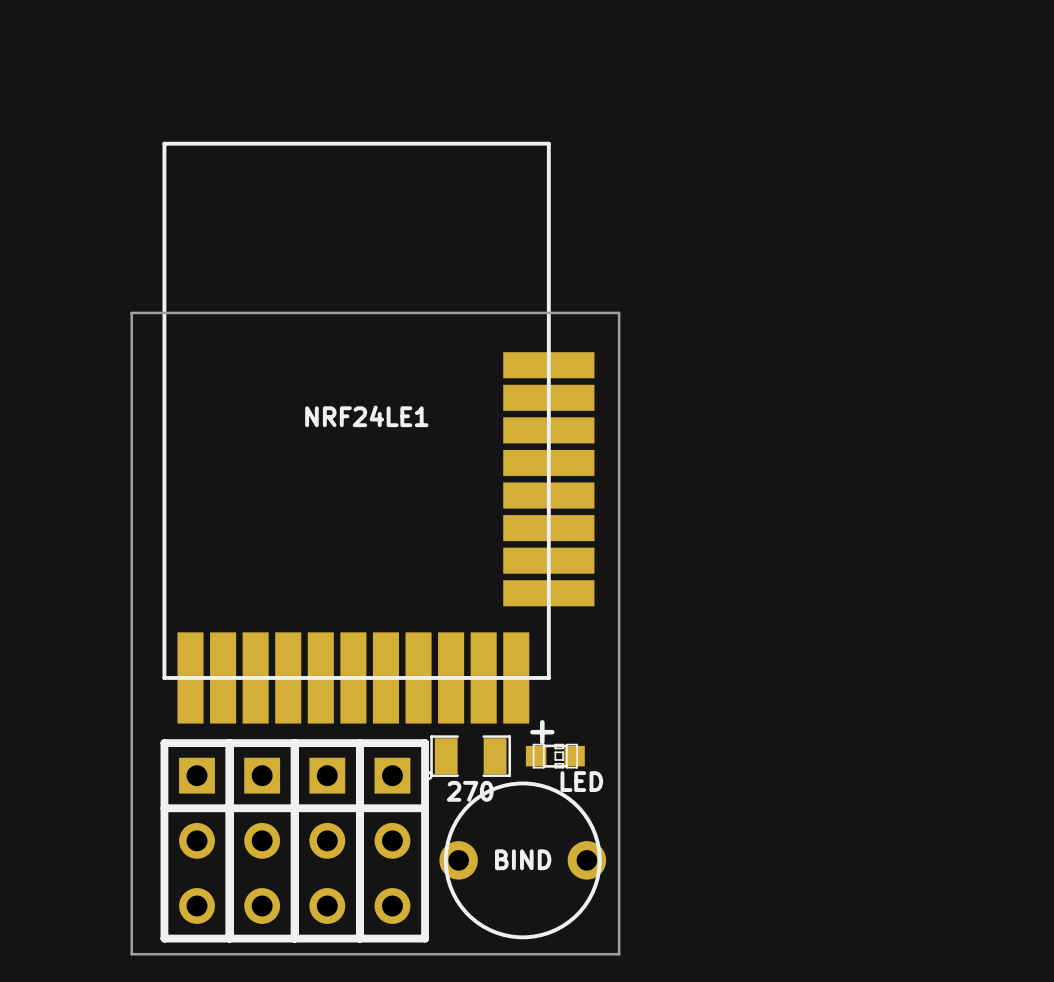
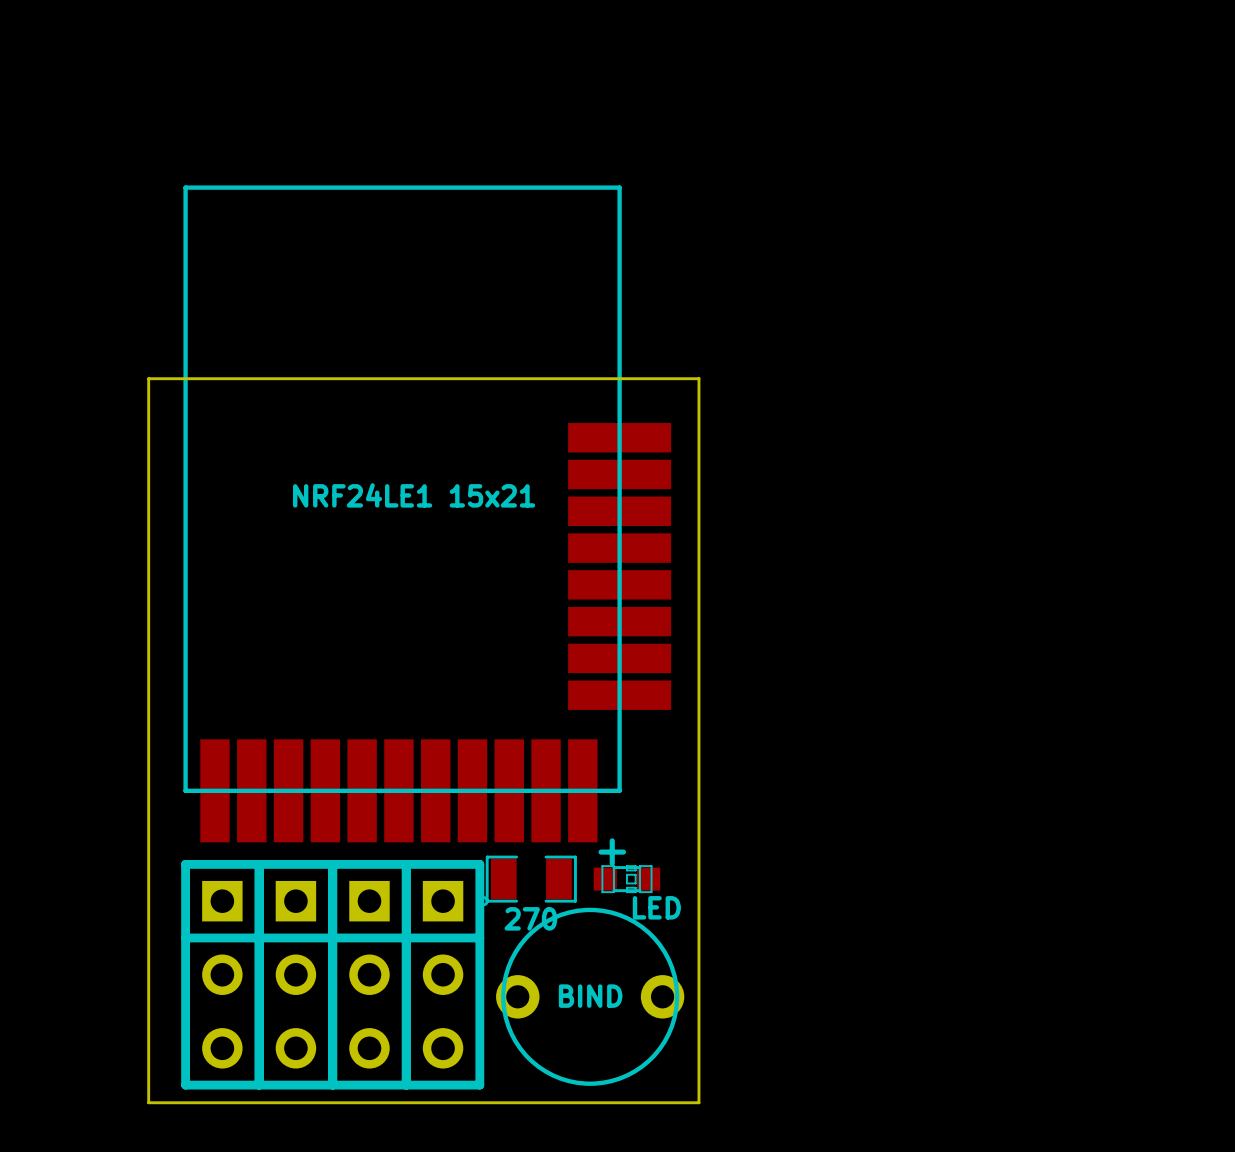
part value: NRF24LE1 (366, 416) -> NRF24LE1 15x21 (414, 495)

